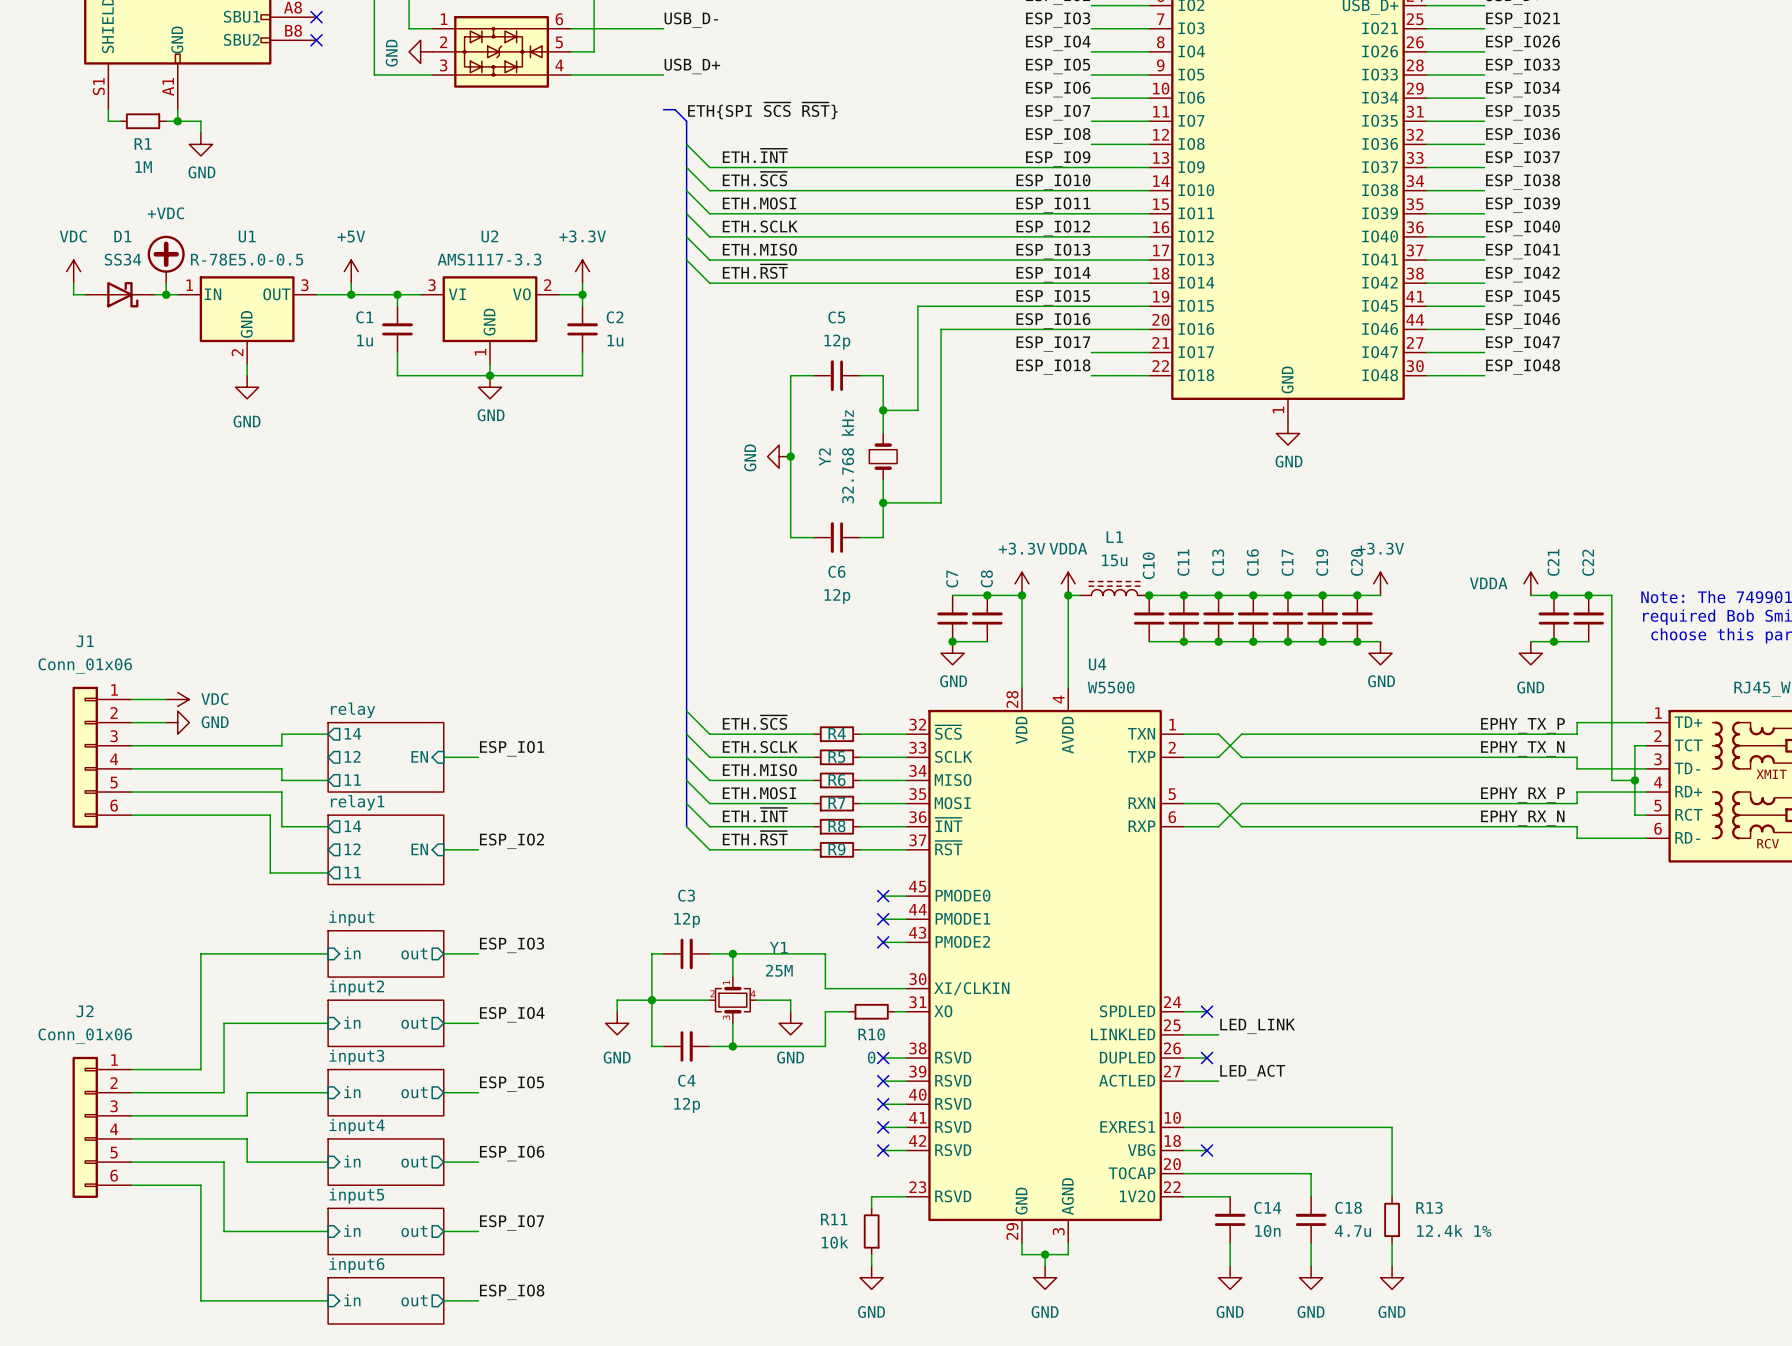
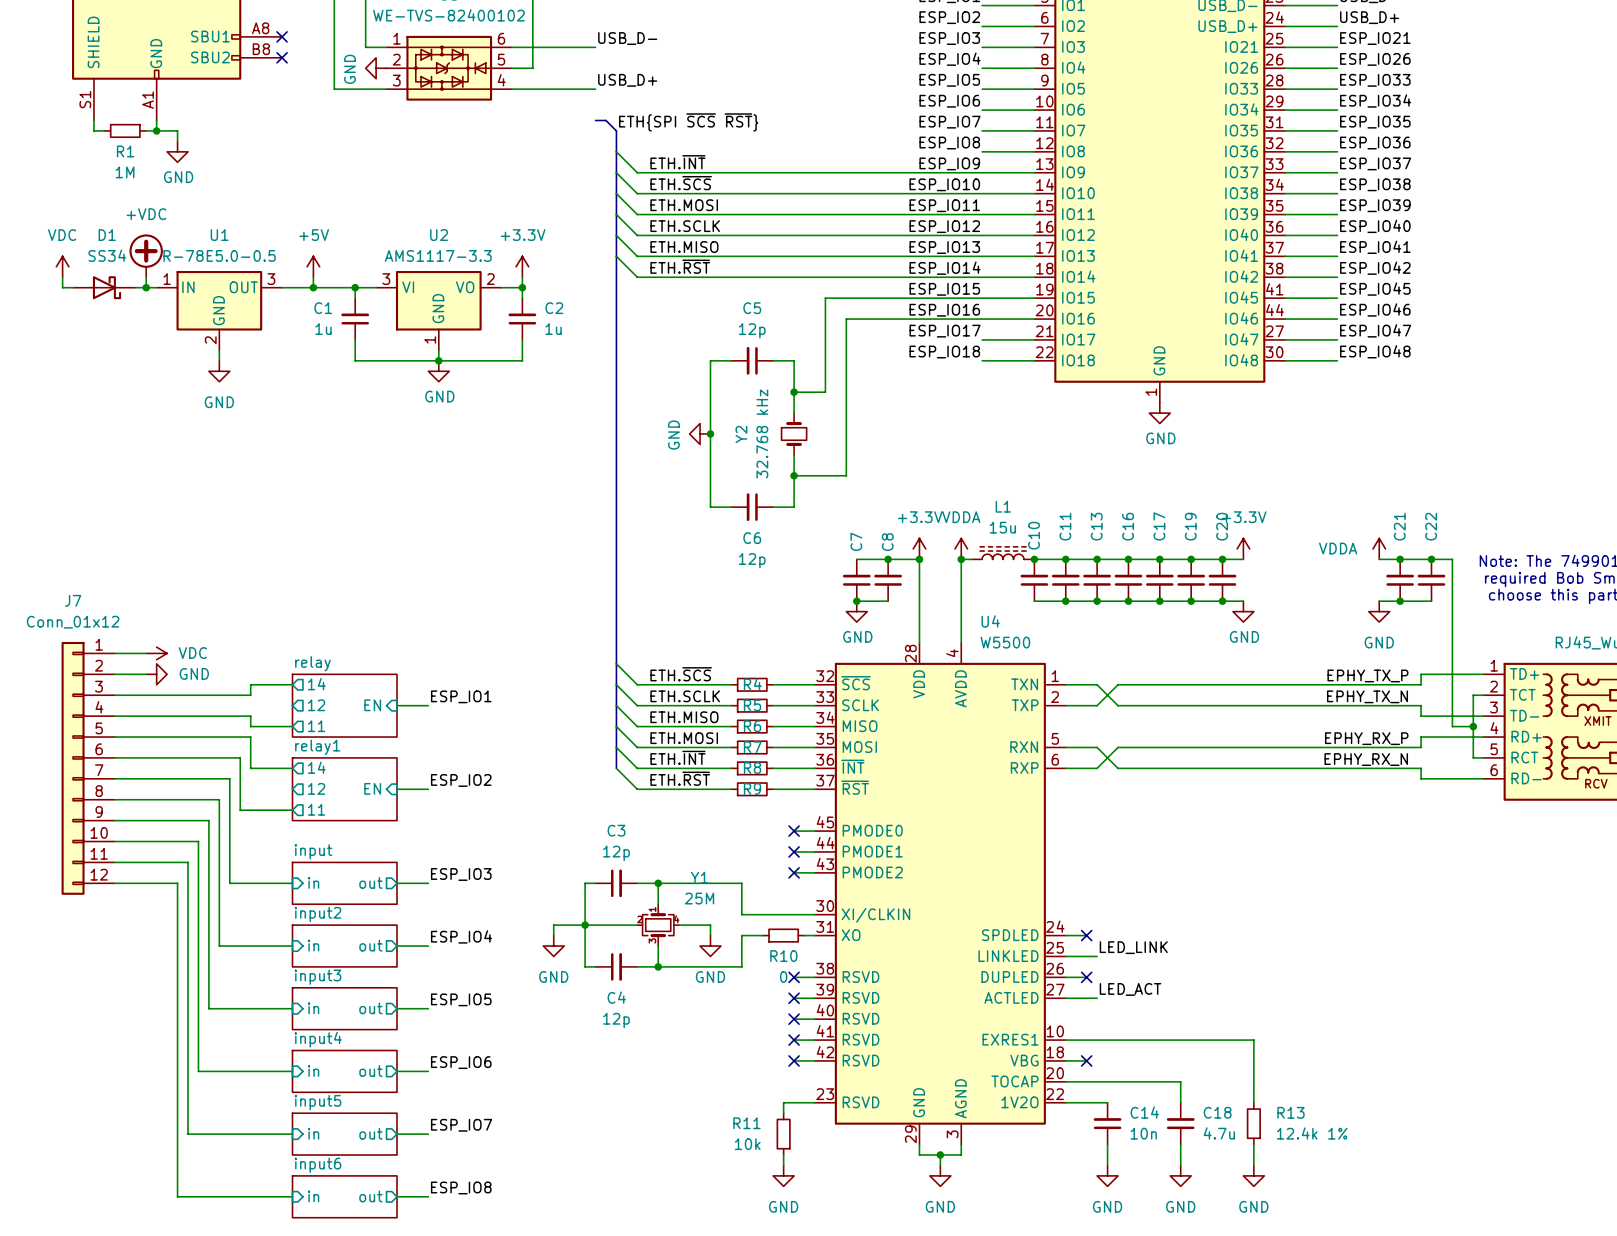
J1: Conn_01x06 (102, 757) -> none
J7: none -> Conn_01x12 (88, 768)
wire: none -> (114, 778) (229, 778) (229, 883)
wire: none -> (114, 799) (219, 799) (219, 946)
wire: (200, 953) (258, 953) -> (177, 883) (114, 883)
wire: (224, 1023) (247, 1023) -> (198, 946) (198, 841) (114, 841)
wire: (131, 1069) (200, 1069) -> (177, 1092) (177, 987)
wire: (131, 1092) (224, 1092) -> none
wire: (247, 1092) (247, 1115) (131, 1115) -> (219, 1008) (208, 1008) (208, 820) (114, 820)
J2: Conn_01x06 (102, 1127) -> none
wire: (131, 1138) (247, 1138) (247, 1162) -> (198, 1008) (198, 1071) (219, 1071)
wire: (131, 1162) (224, 1162) (224, 1231) -> (114, 862) (188, 862) (188, 1134) (198, 1134)
wire: (131, 1185) (200, 1185) -> none

